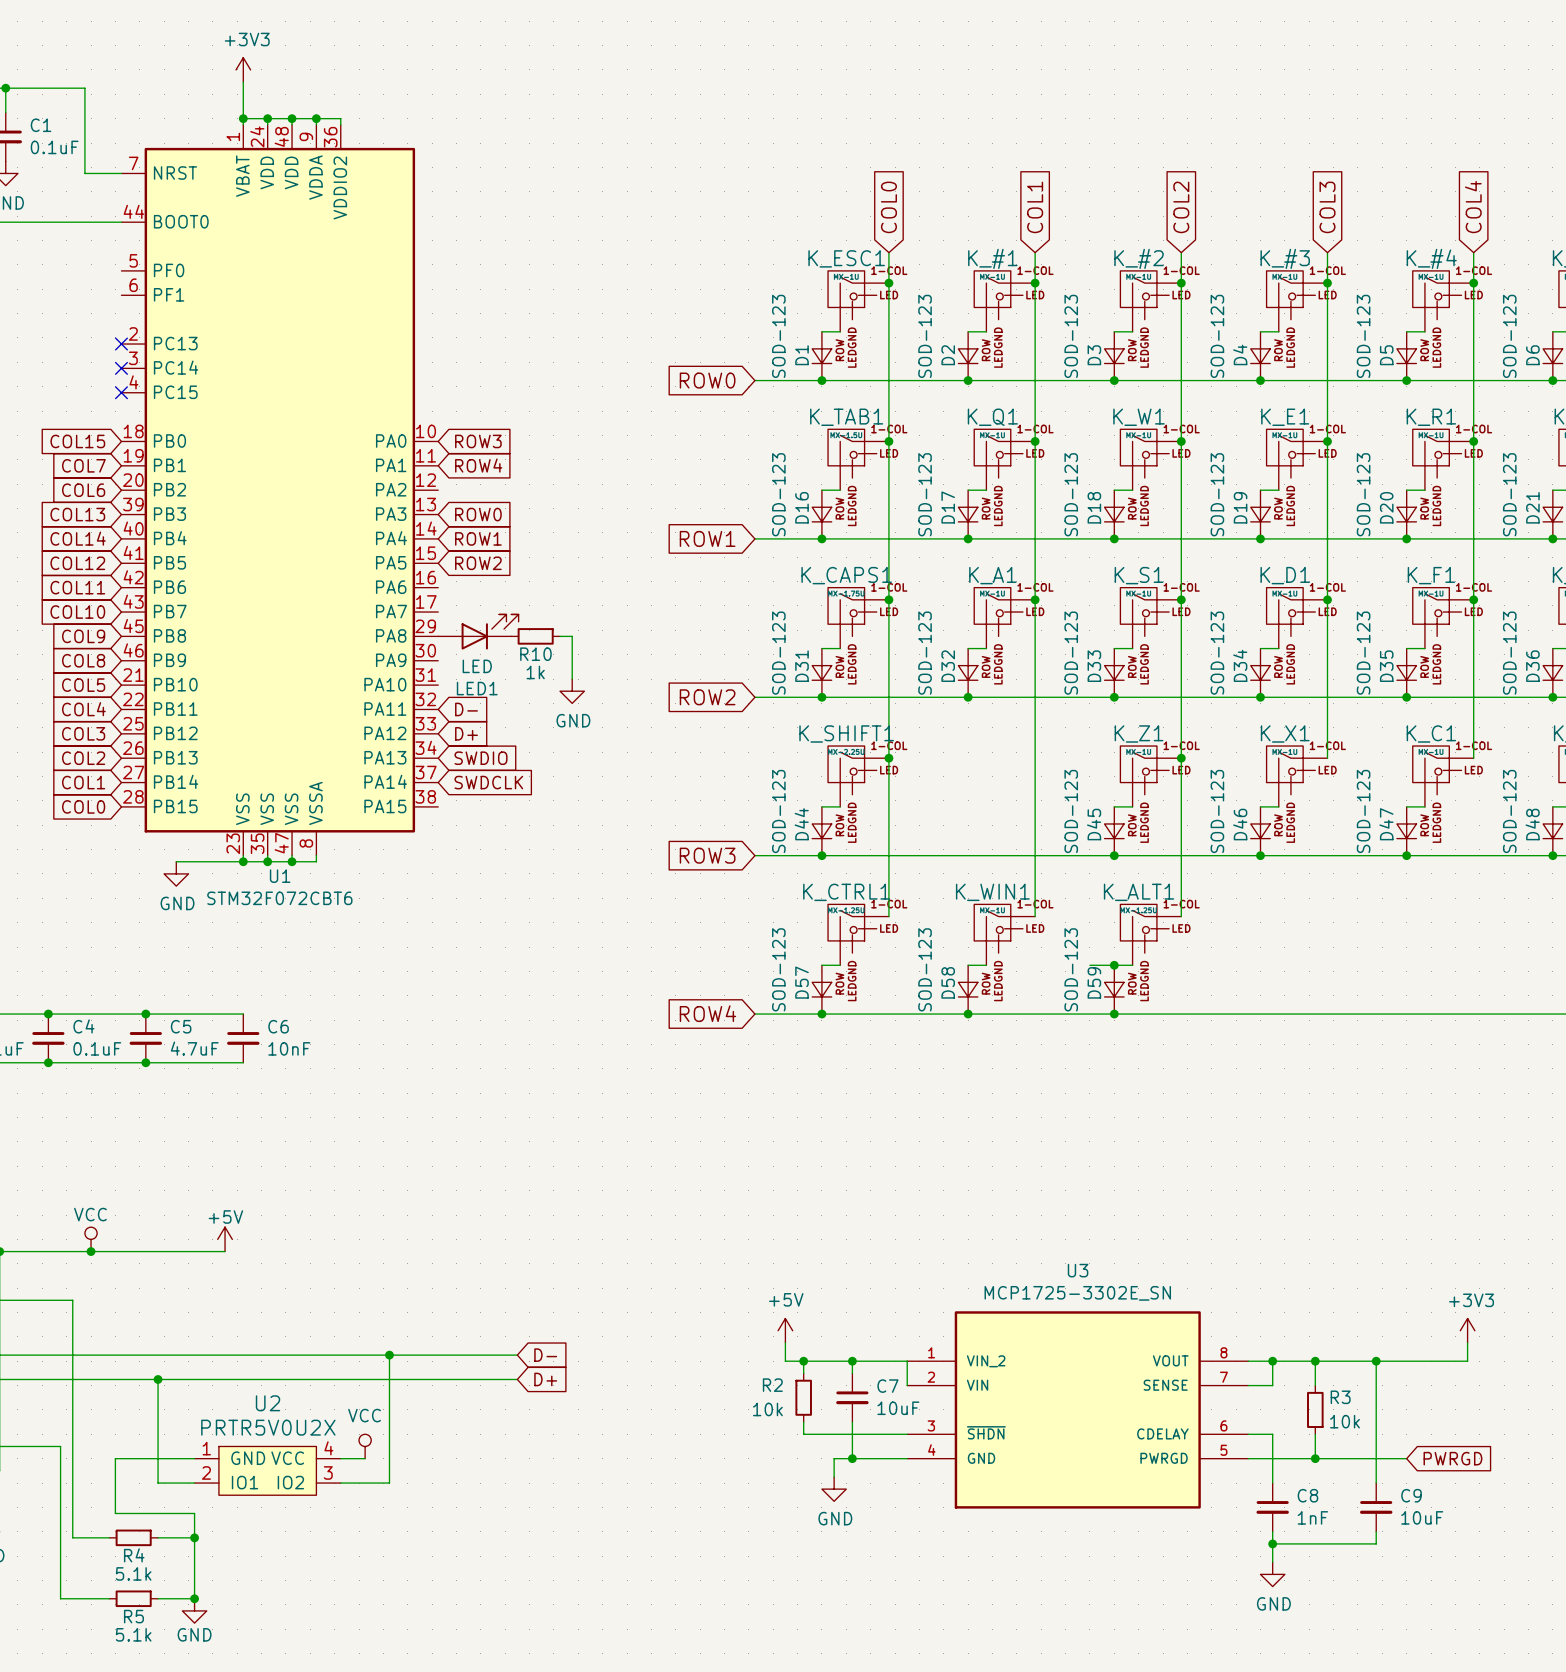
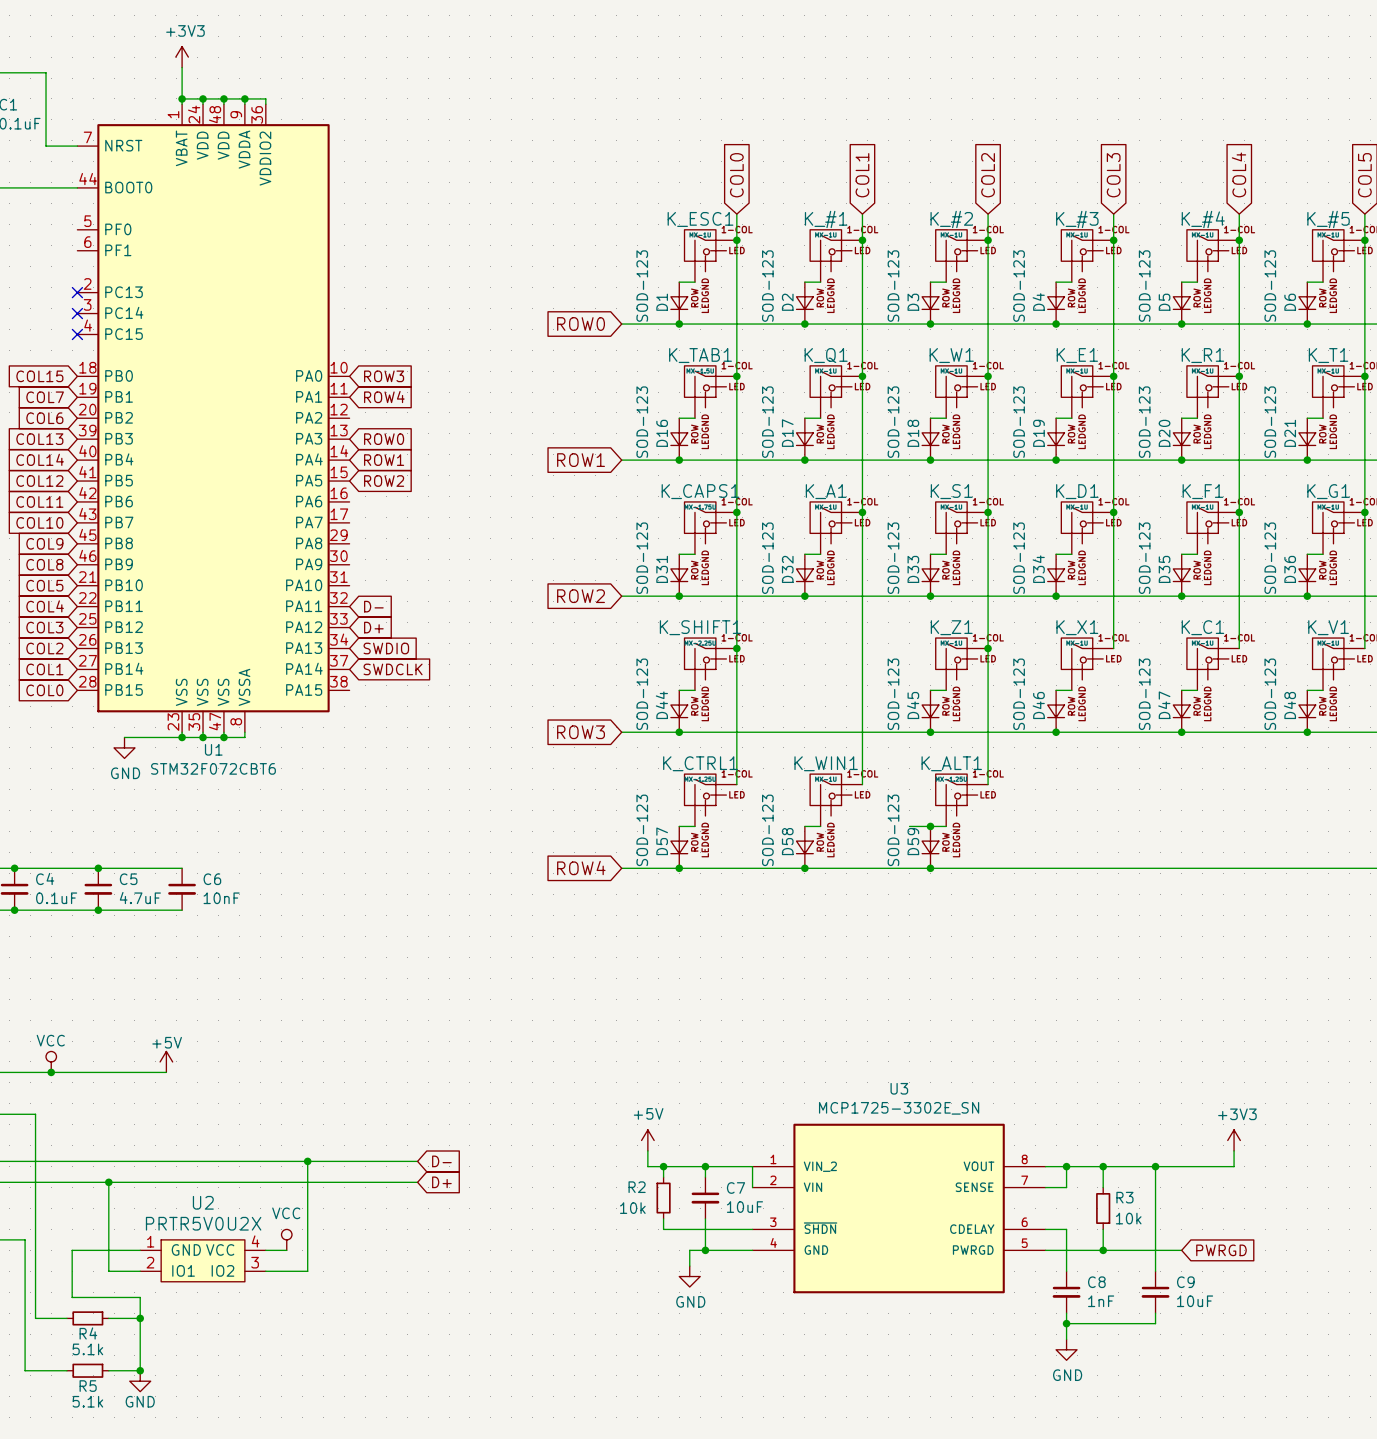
LED1: LED (478, 631) -> none
R10: 1k (535, 636) -> none
wire: (560, 636) (572, 636) (572, 679) -> none
power symbol: GND (572, 691) -> none

